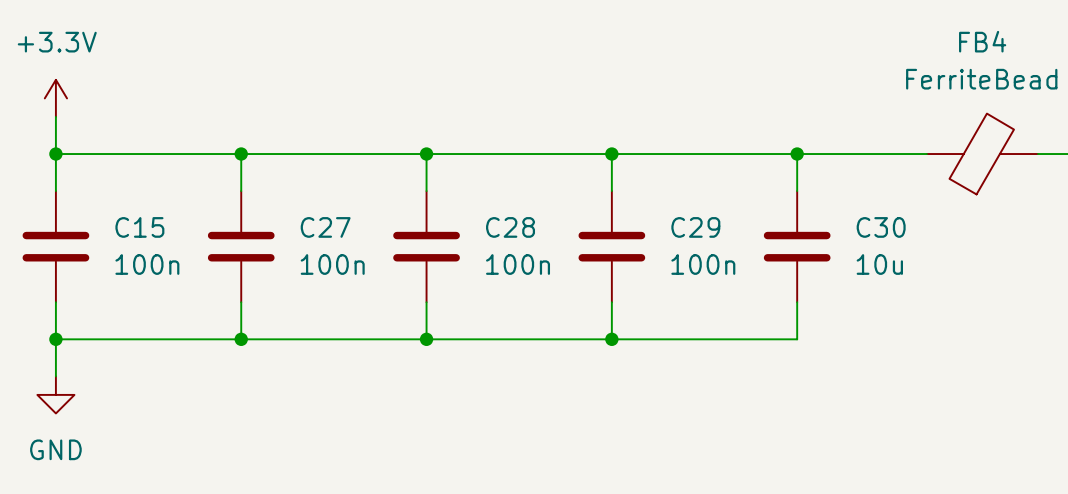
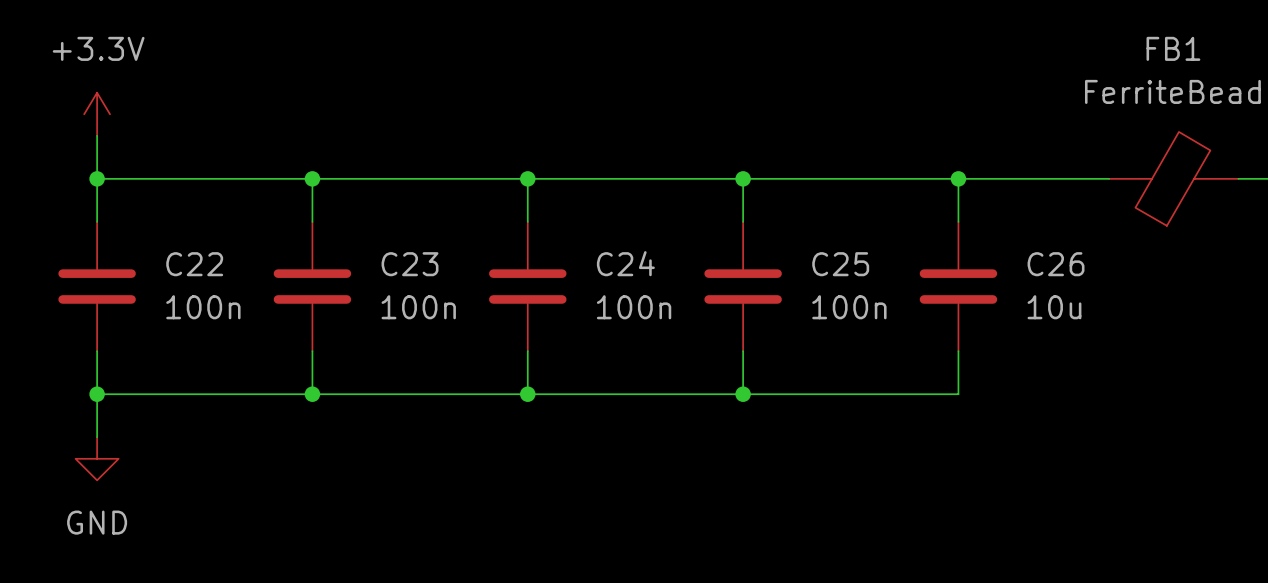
FB4 name: FB4 (982, 41) -> FB1 (1173, 48)
C15 name: C15 (139, 227) -> C22 (194, 264)
C27 name: C27 (325, 227) -> C23 (410, 264)
C28 name: C28 (510, 227) -> C24 (625, 263)
C29 name: C29 (695, 227) -> C25 (840, 264)
C30 name: C30 (881, 227) -> C26 (1056, 264)

